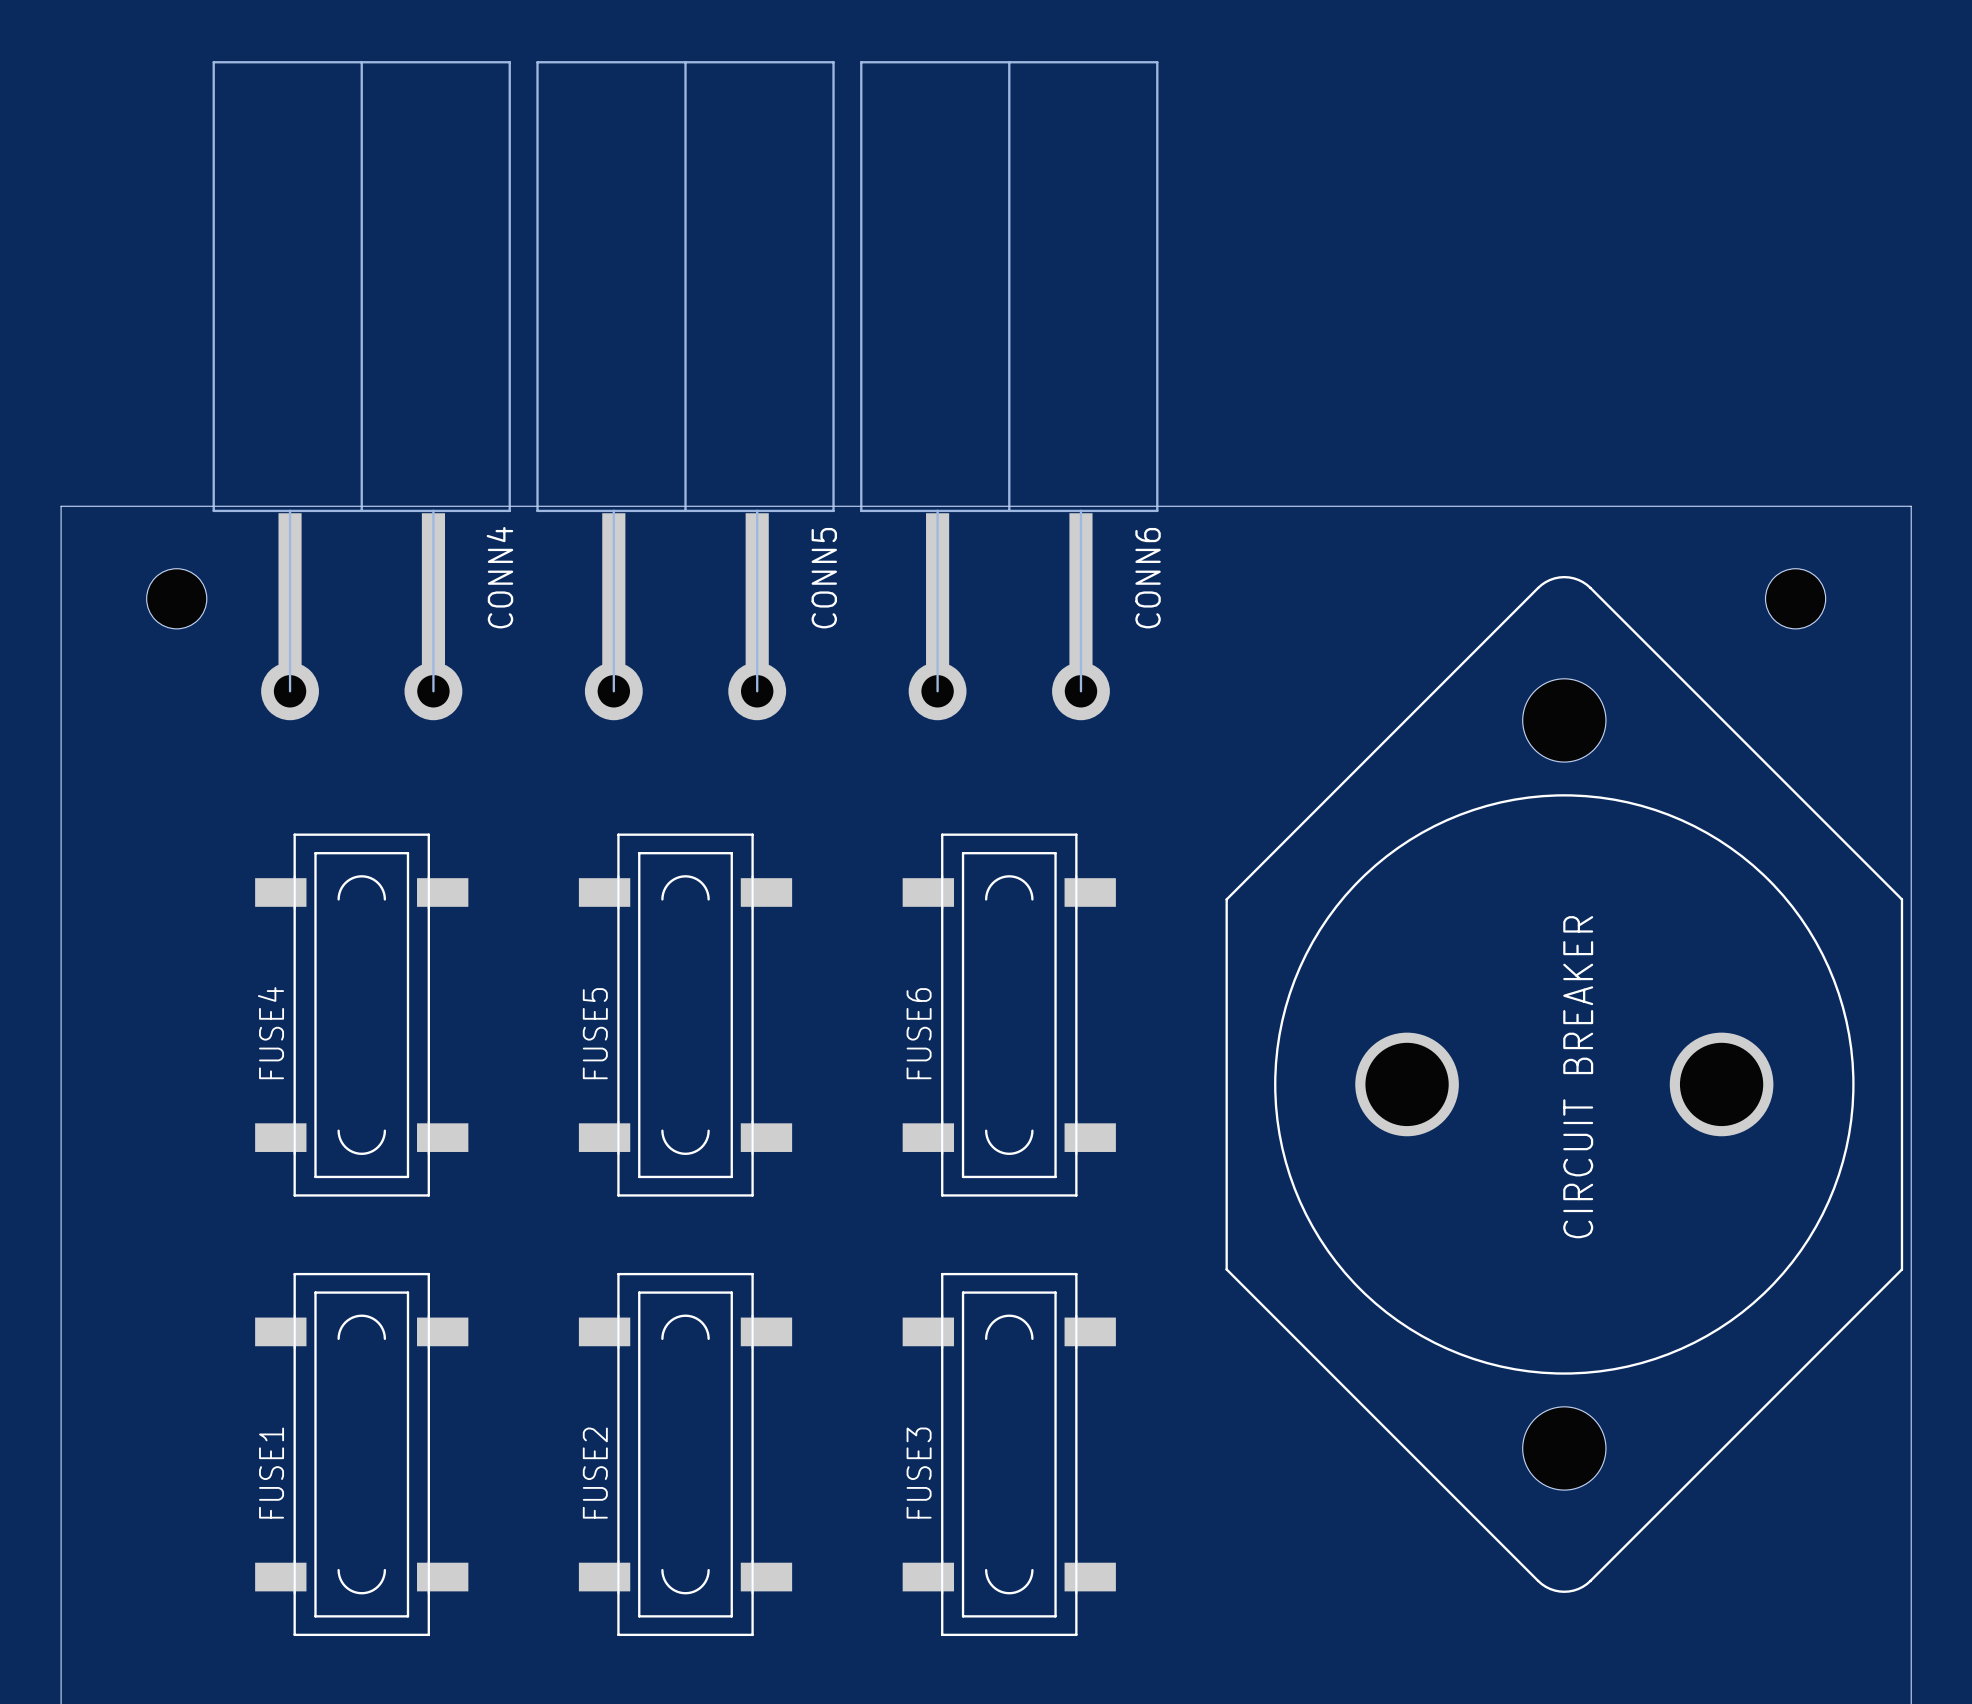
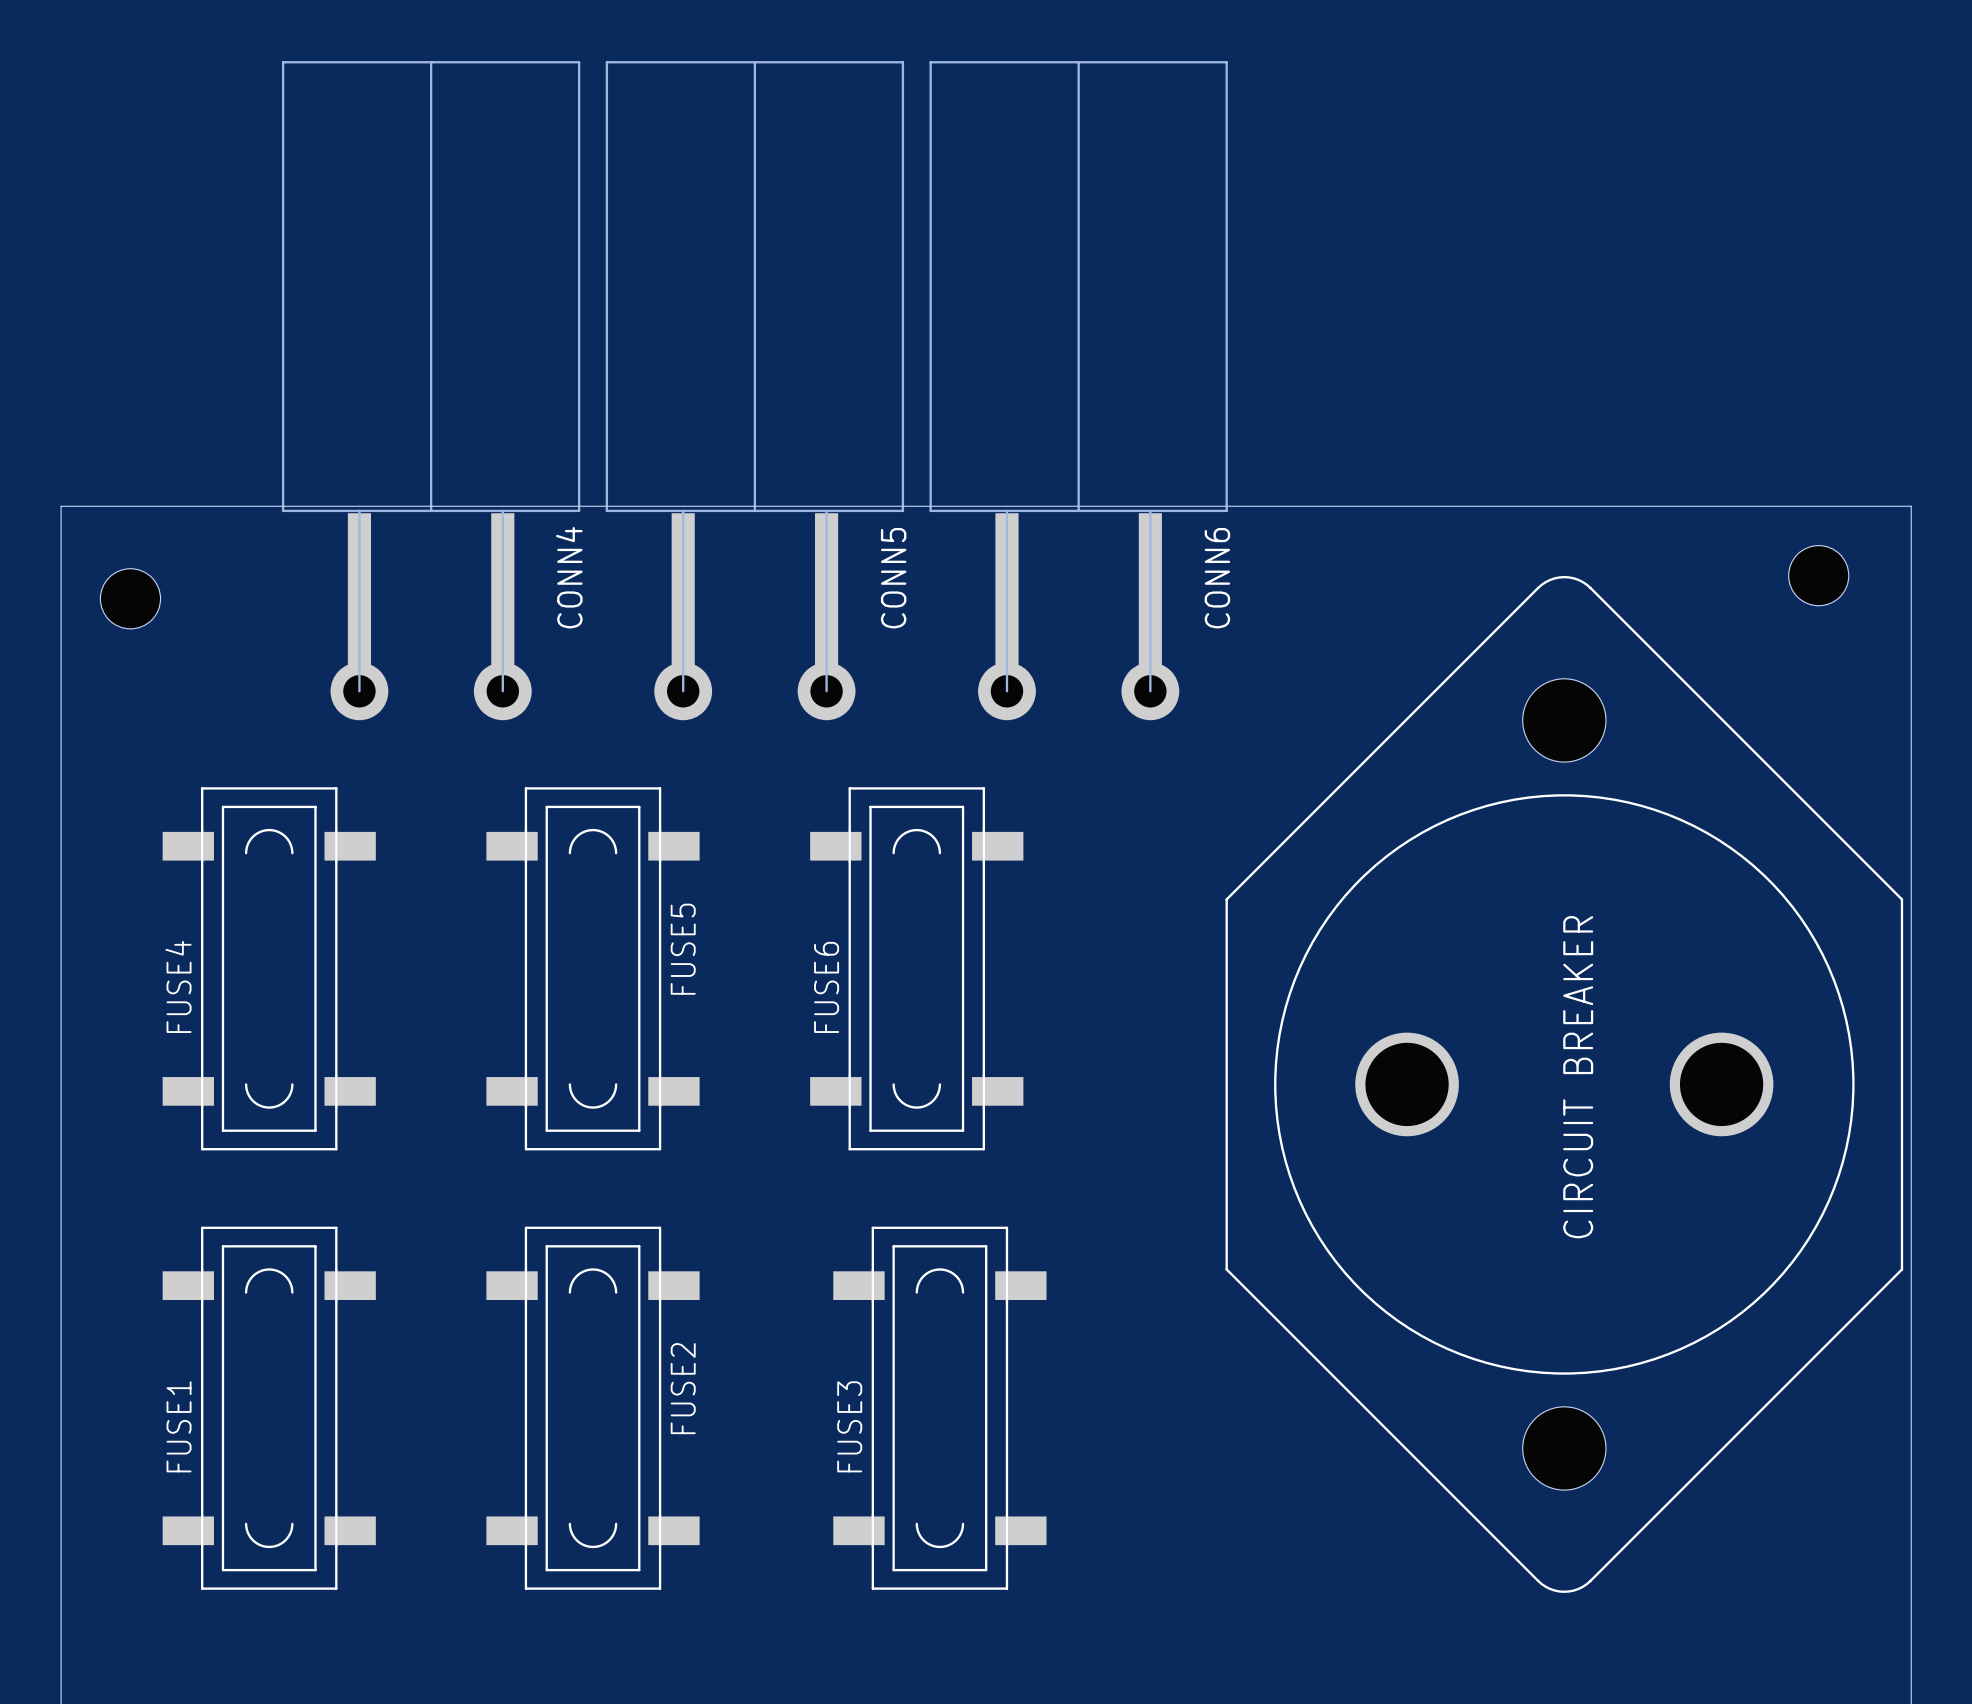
CONN4 position: (361, 390) -> (431, 390)
CONN5 position: (685, 390) -> (754, 390)
CONN6 position: (1009, 390) -> (1078, 390)
part position: (176, 598) -> (130, 598)
part position: (1795, 598) -> (1818, 575)
FUSE4 position: (361, 1015) -> (269, 968)
FUSE5 position: (685, 1015) -> (593, 968)
FUSE6 position: (1009, 1015) -> (916, 968)
FUSE5 name position: FUSE5 (595, 1033) -> FUSE5 (683, 949)
FUSE1 position: (361, 1454) -> (269, 1408)
FUSE2 position: (685, 1454) -> (593, 1408)
FUSE3 position: (1009, 1454) -> (939, 1408)
FUSE2 name position: FUSE2 (595, 1473) -> FUSE2 (683, 1388)

